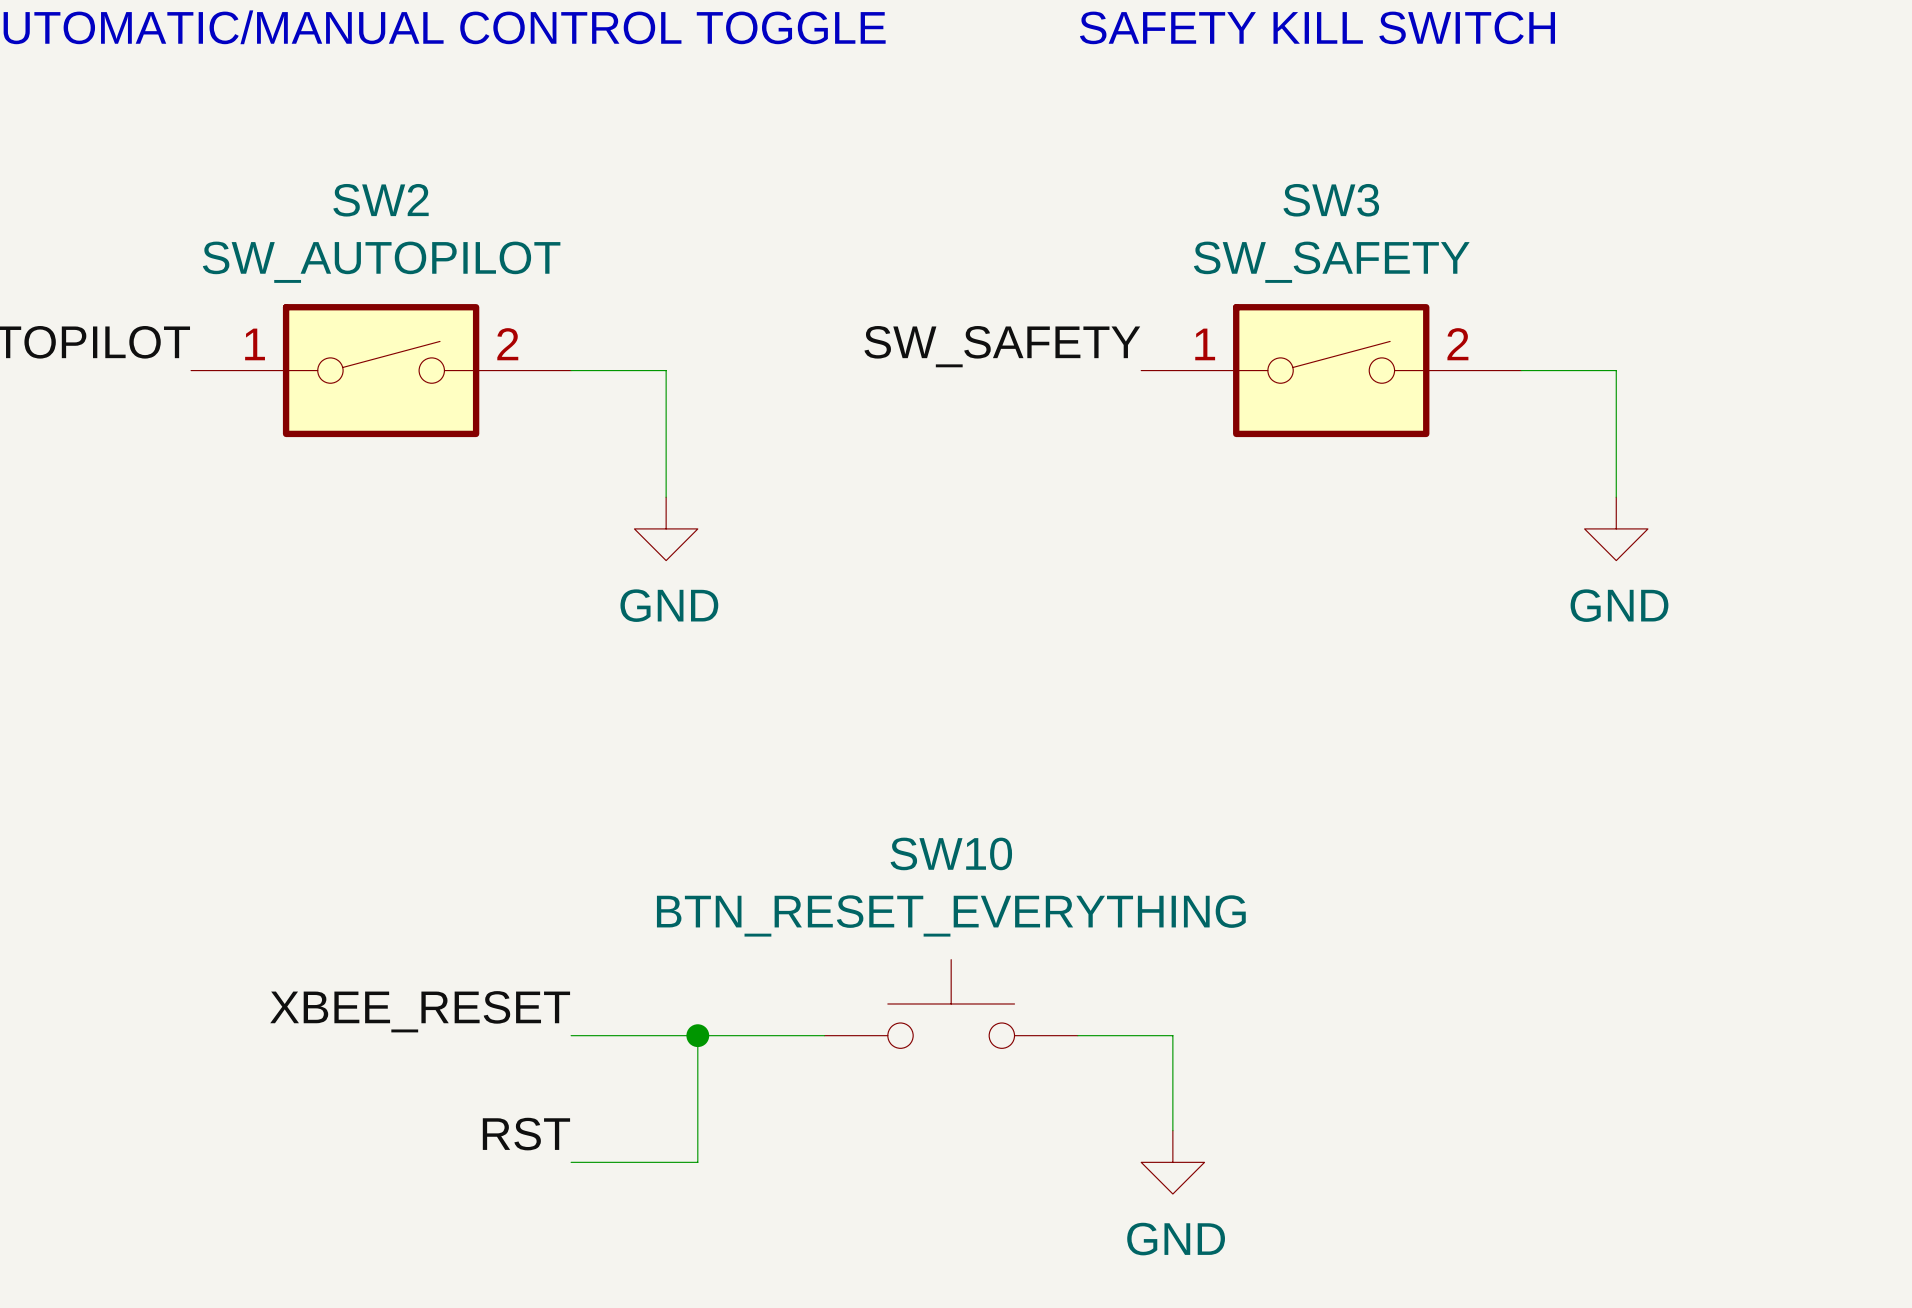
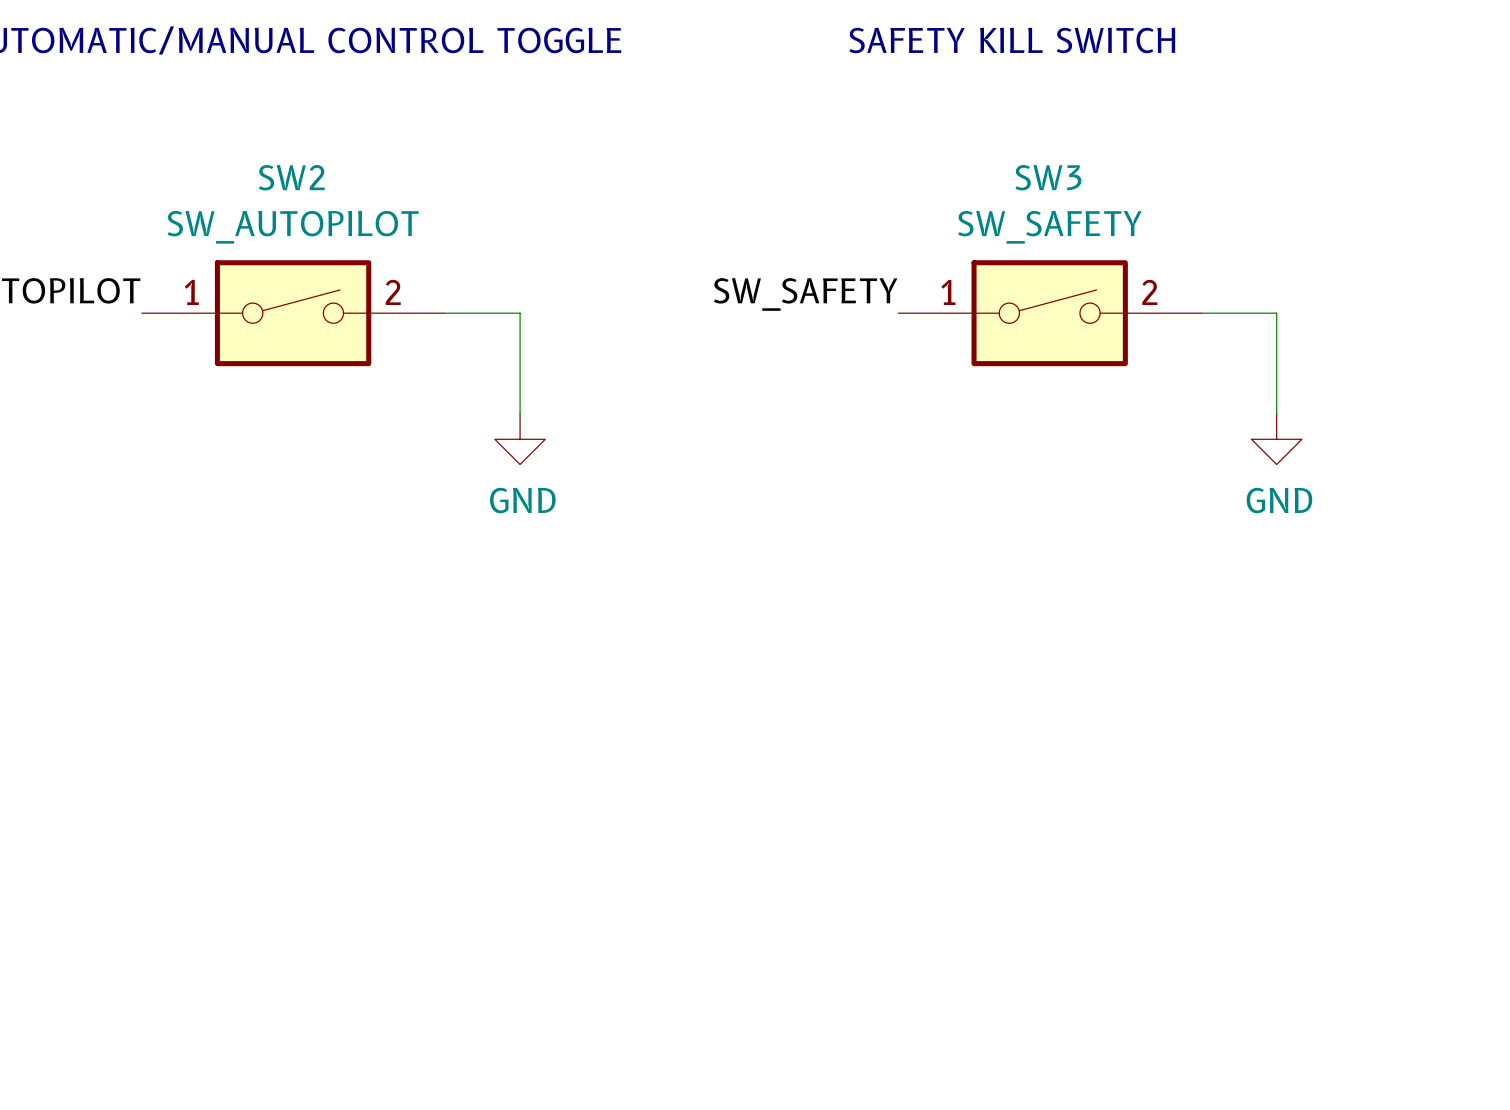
SW10: BTN_RESET_EVERYTHING (951, 1003) -> none
label: XBEE_RESET (420, 1011) -> none
wire: (571, 1035) (824, 1035) -> none
wire: (697, 1035) (697, 1162) (571, 1162) -> none
junction: (697, 1035) -> none
wire: (1077, 1035) (1172, 1035) (1172, 1130) -> none
label: RST (526, 1134) -> none
power symbol: GND (1172, 1162) -> none

